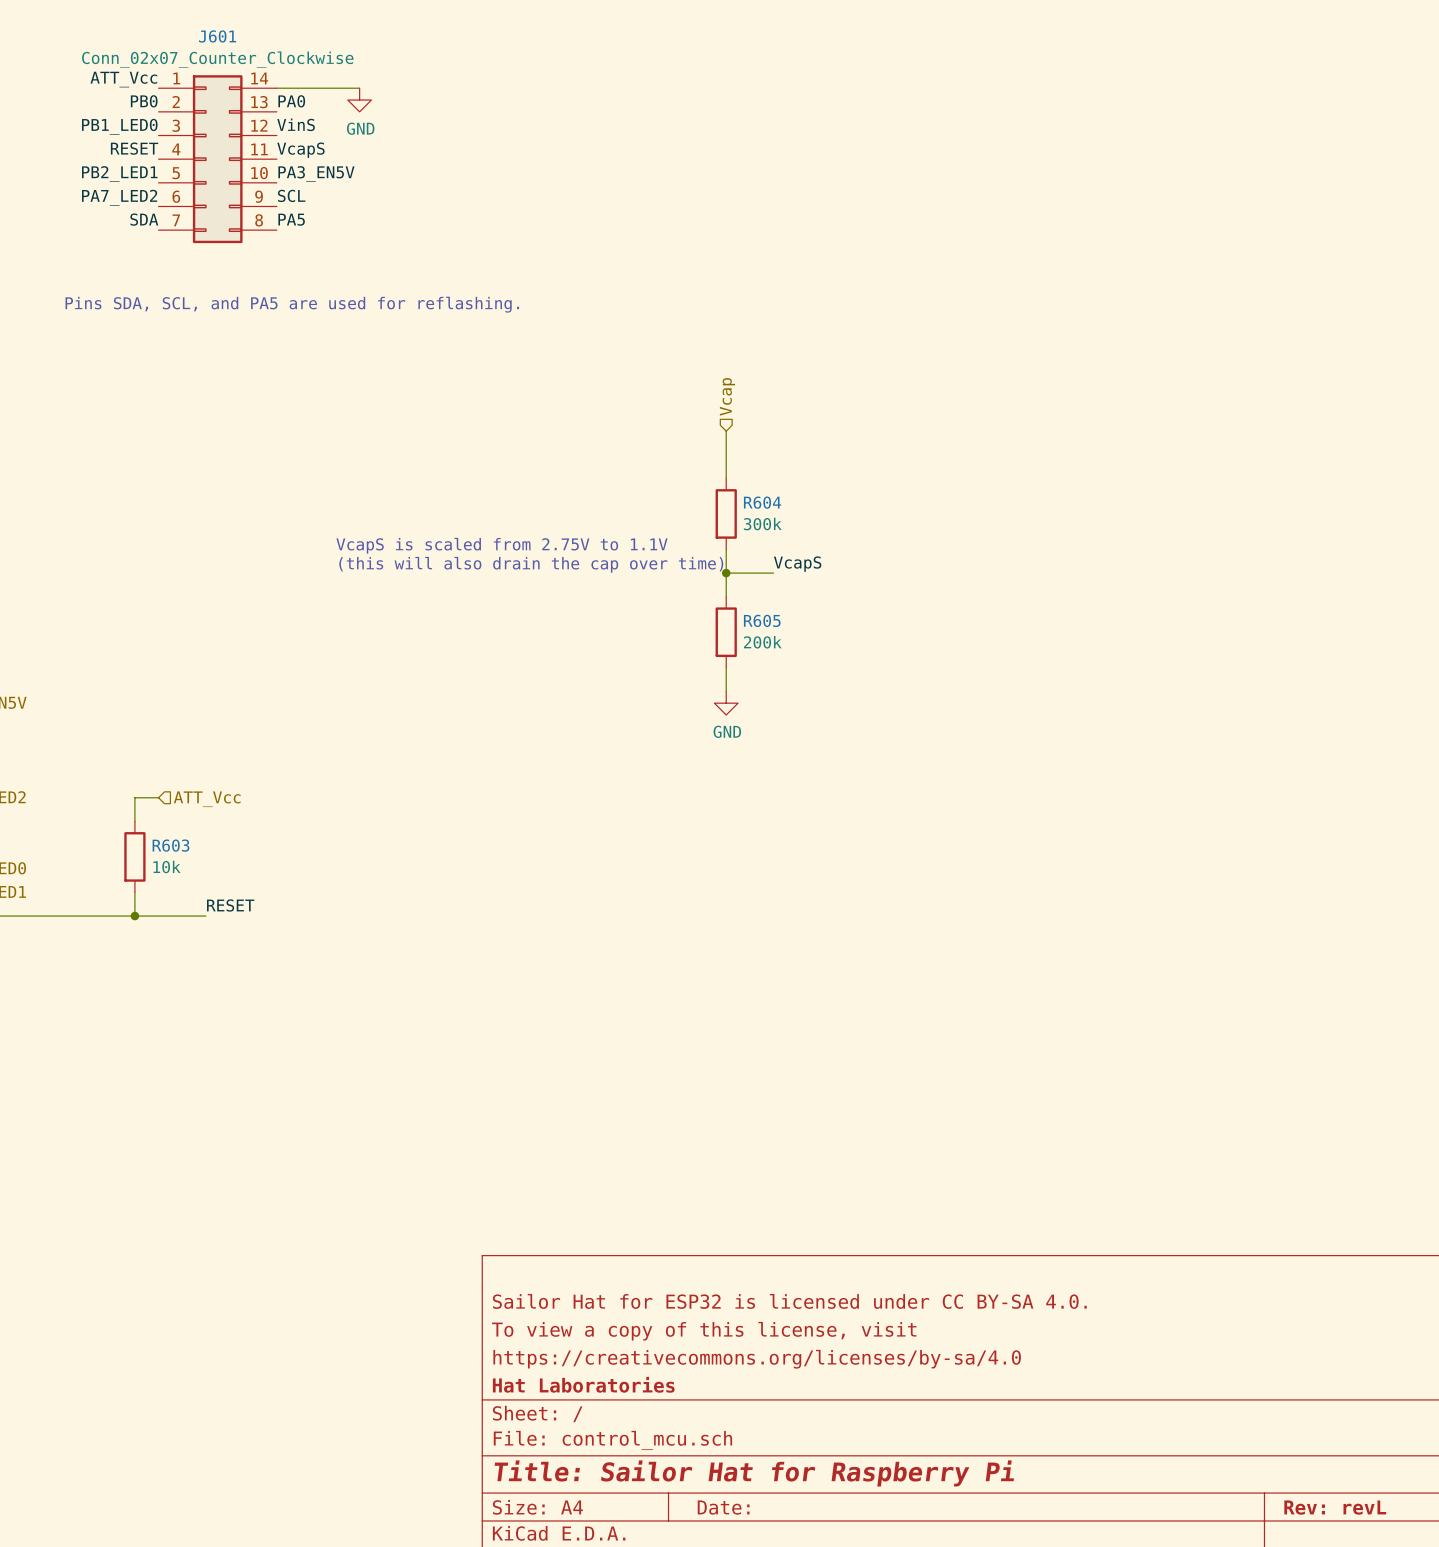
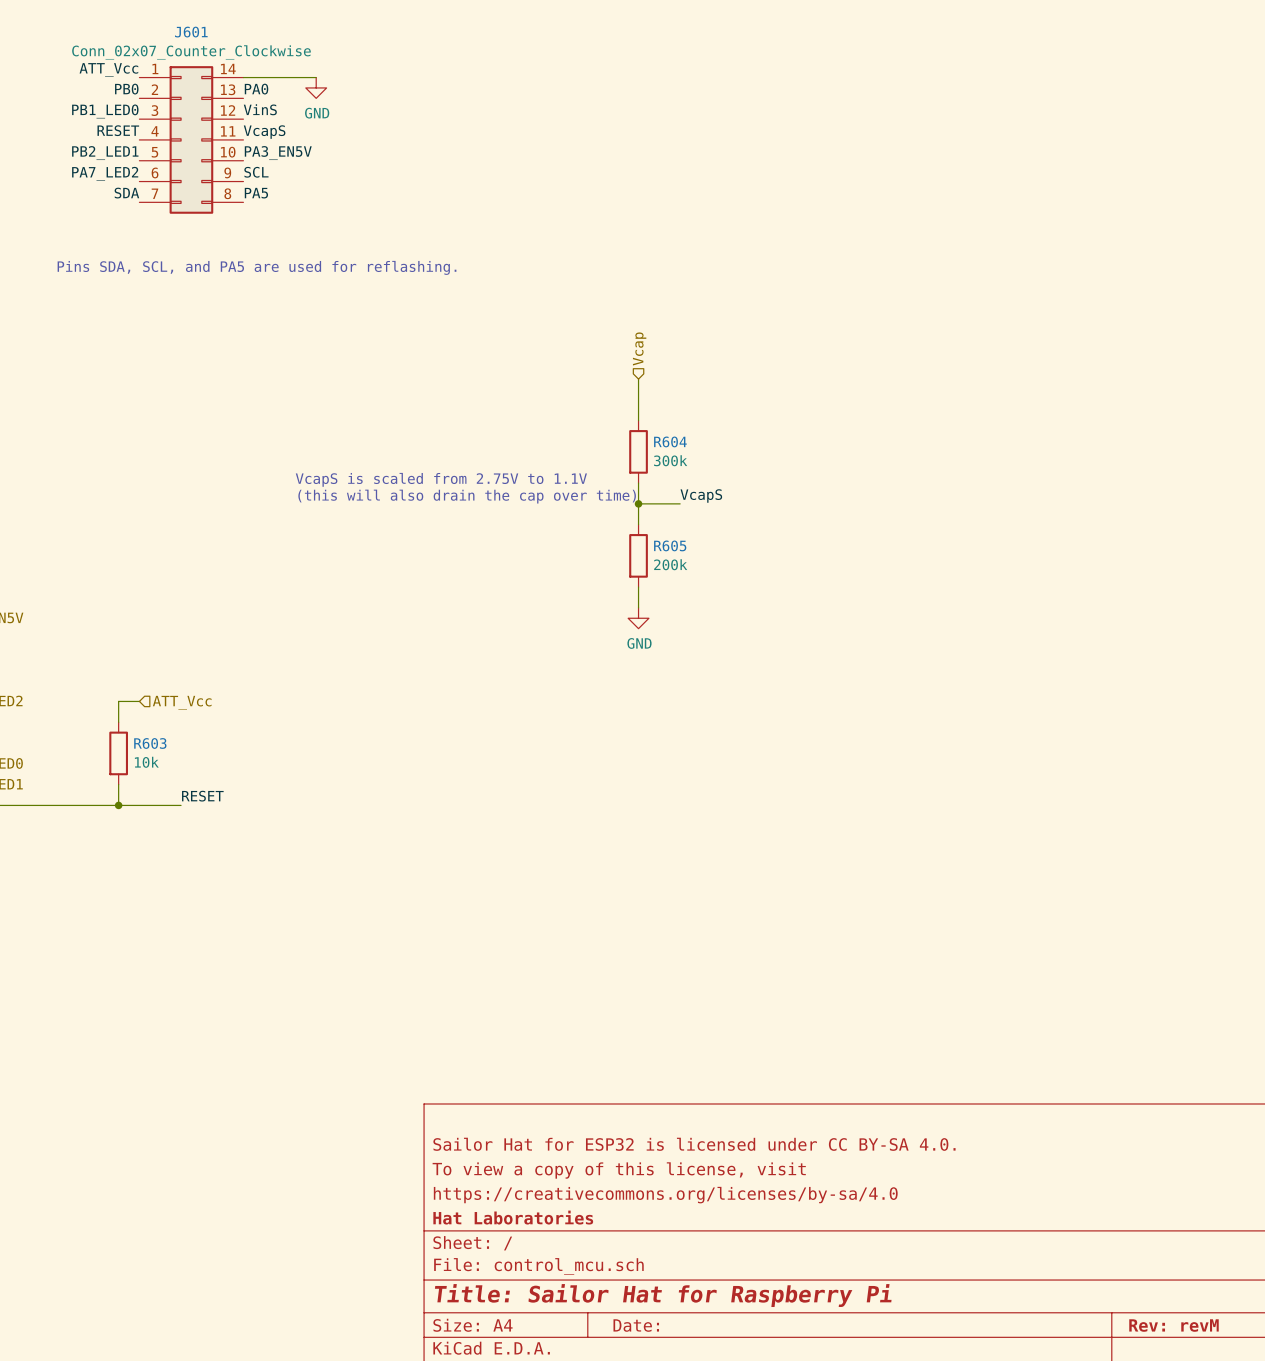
title block: Rev: revL (1335, 1507) -> Rev: revM (1173, 1325)

